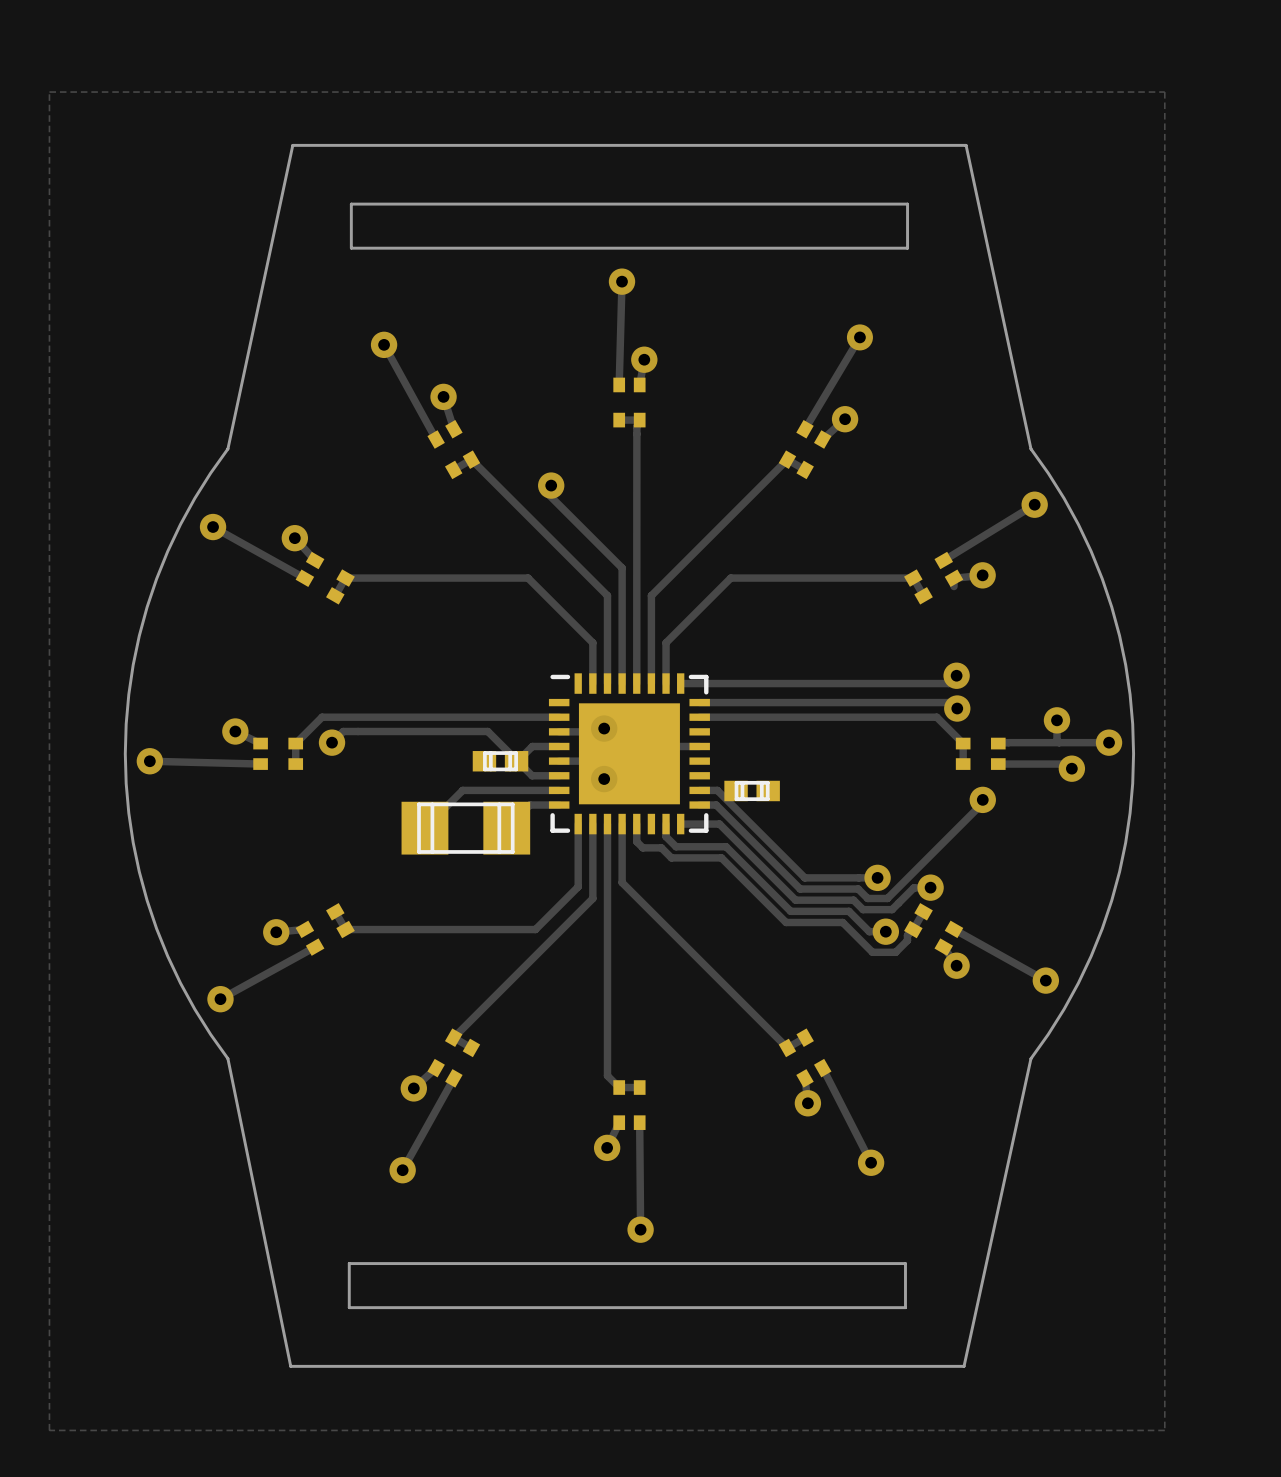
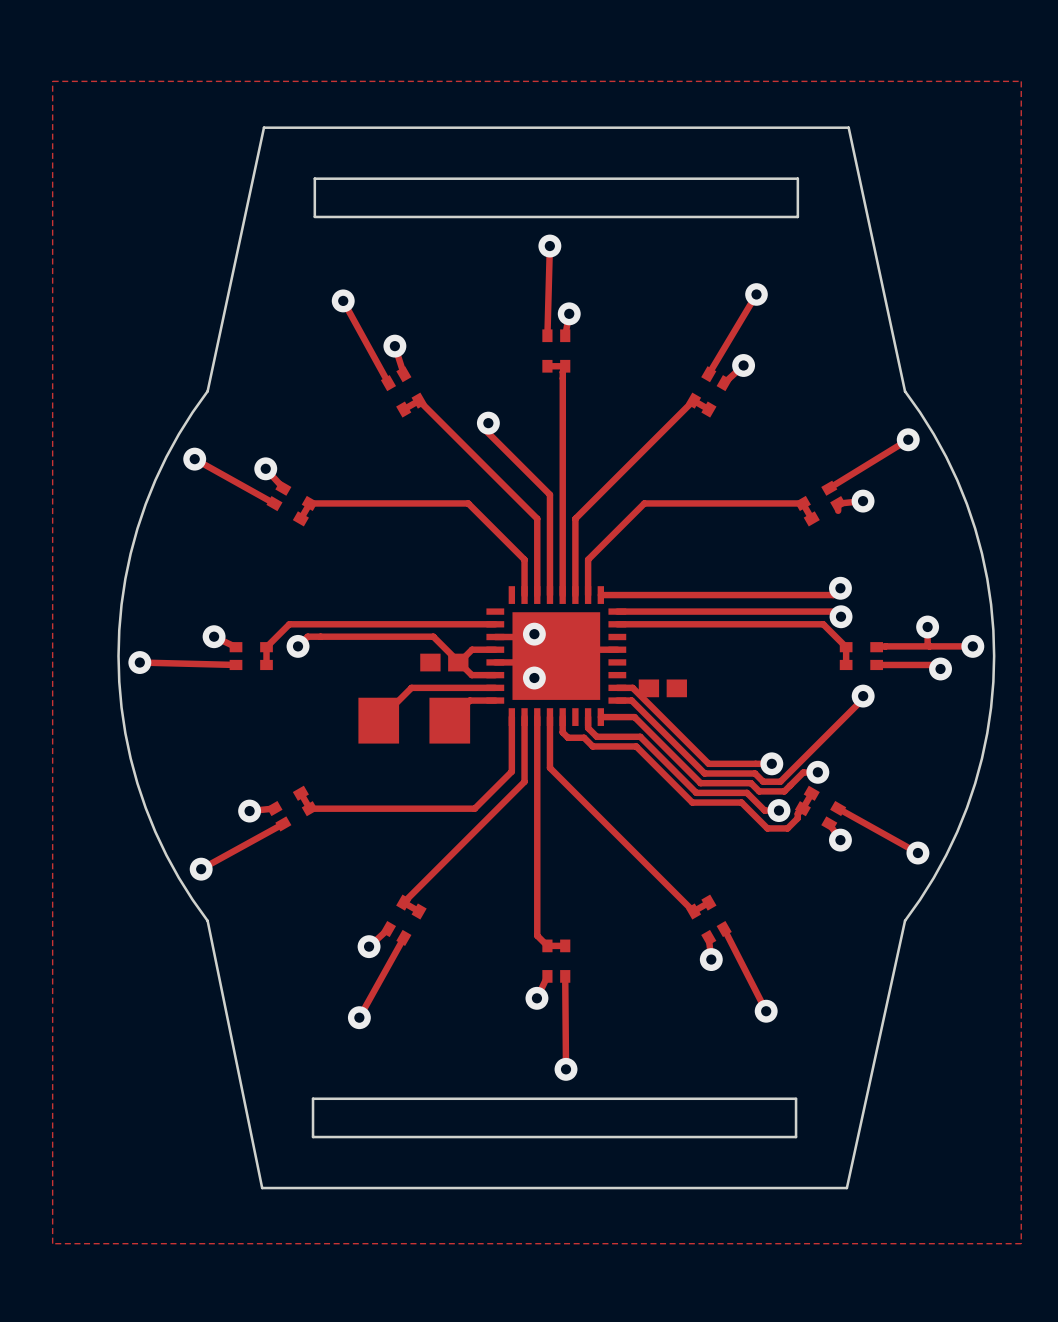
part footprint: [548, 673, 710, 835] -> [486, 586, 627, 726]
part footprint: [472, 751, 529, 772] -> [420, 653, 469, 672]
part footprint: [724, 780, 780, 802] -> [638, 679, 687, 698]
part footprint: [401, 801, 531, 855] -> [358, 697, 471, 744]

